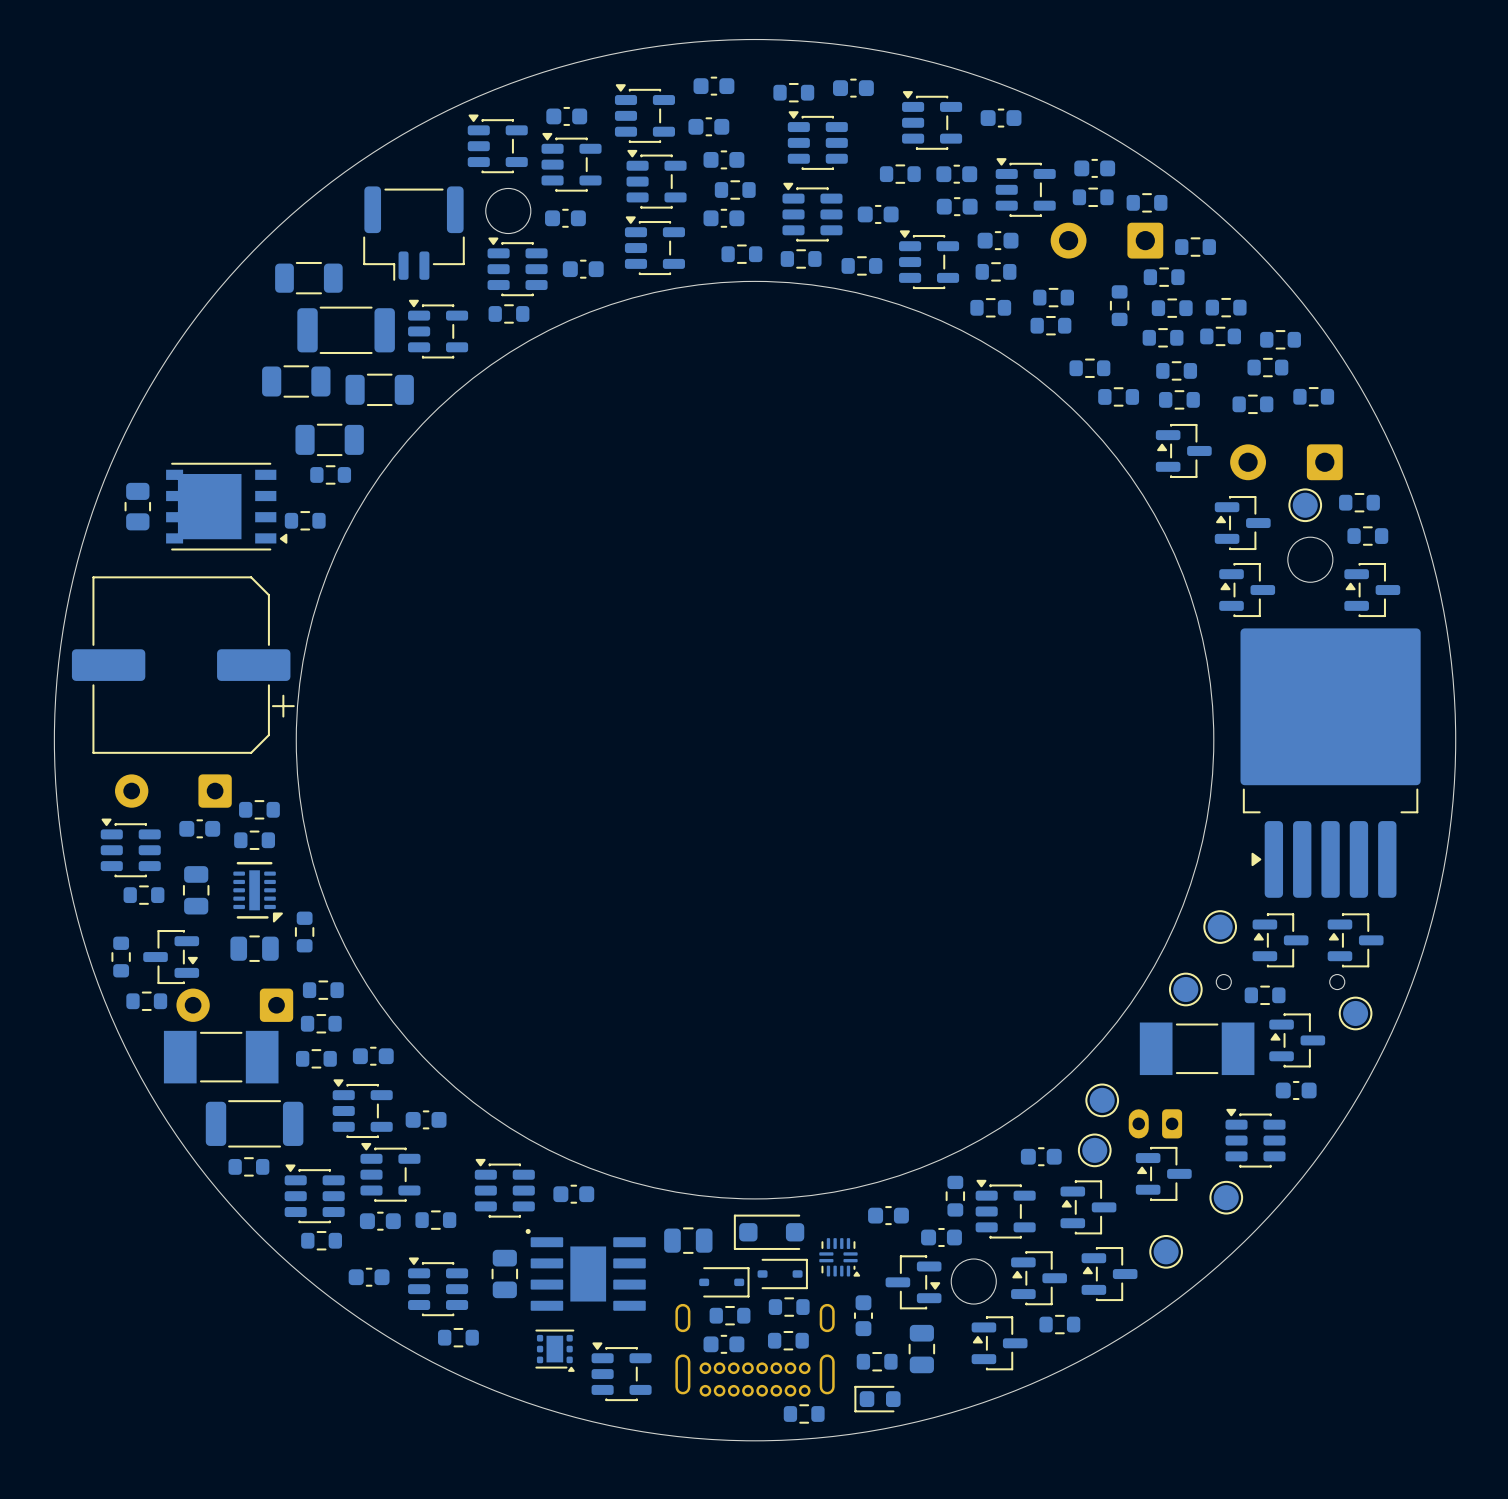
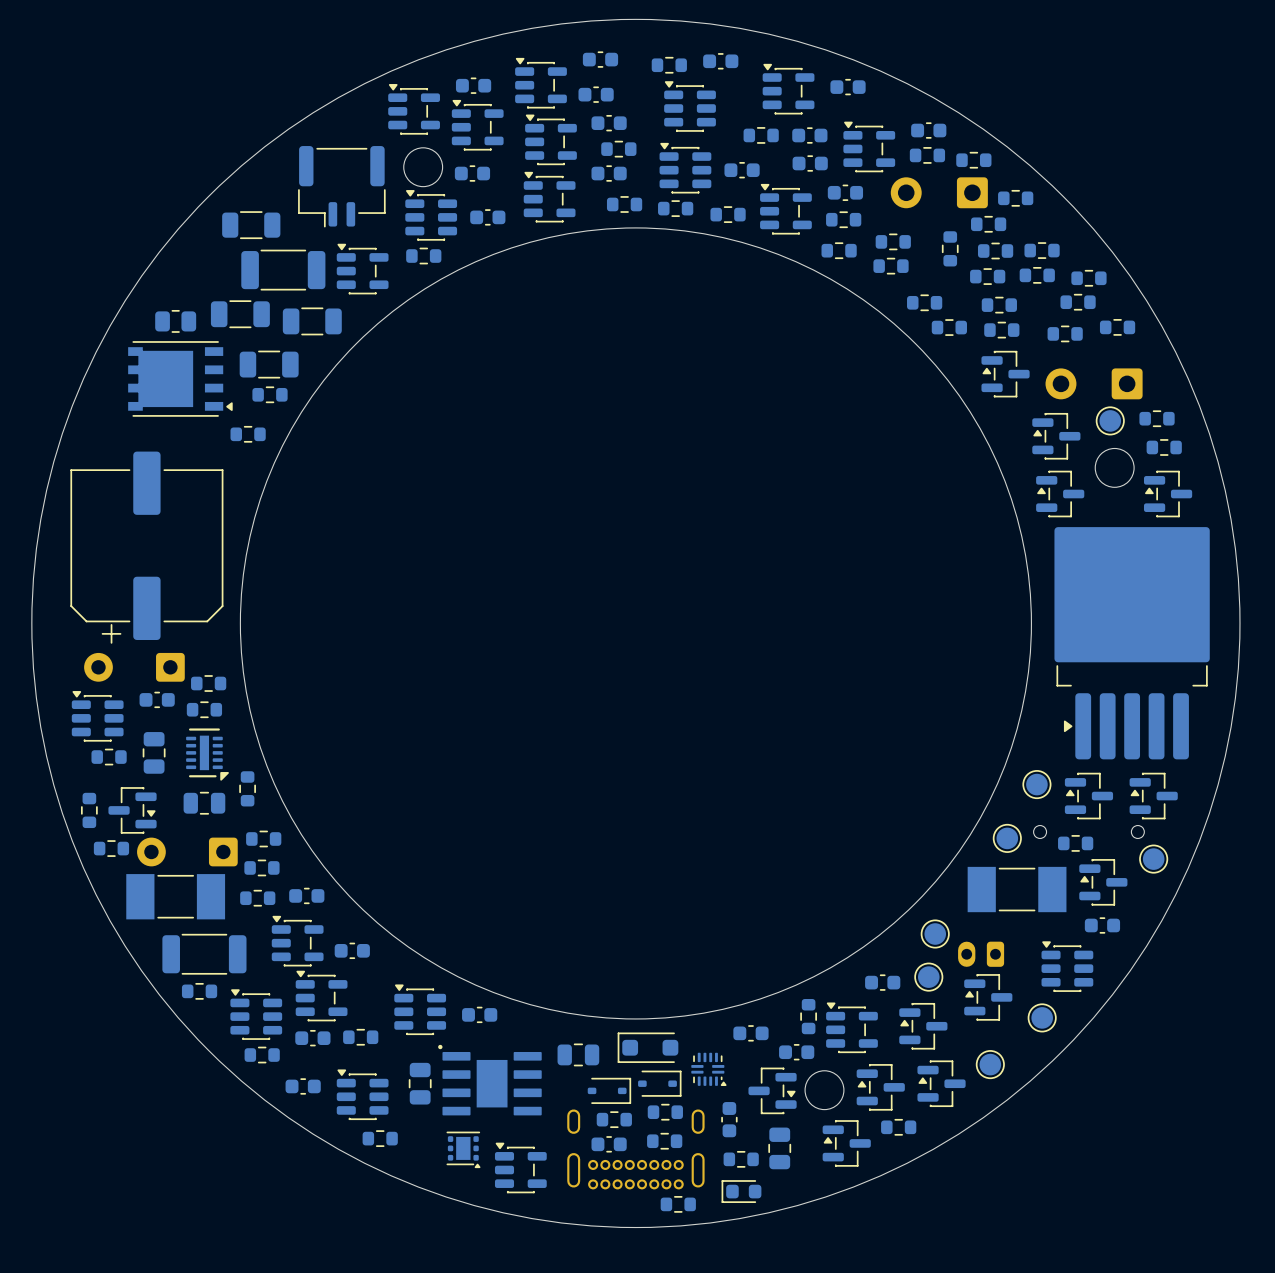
part rotation: 0° (137, 506) -> 90° clockwise (175, 321)
part position: (137, 506) -> (175, 321)
part position: (226, 506) -> (180, 378)
part rotation: 0° (183, 665) -> 90° clockwise (146, 547)

